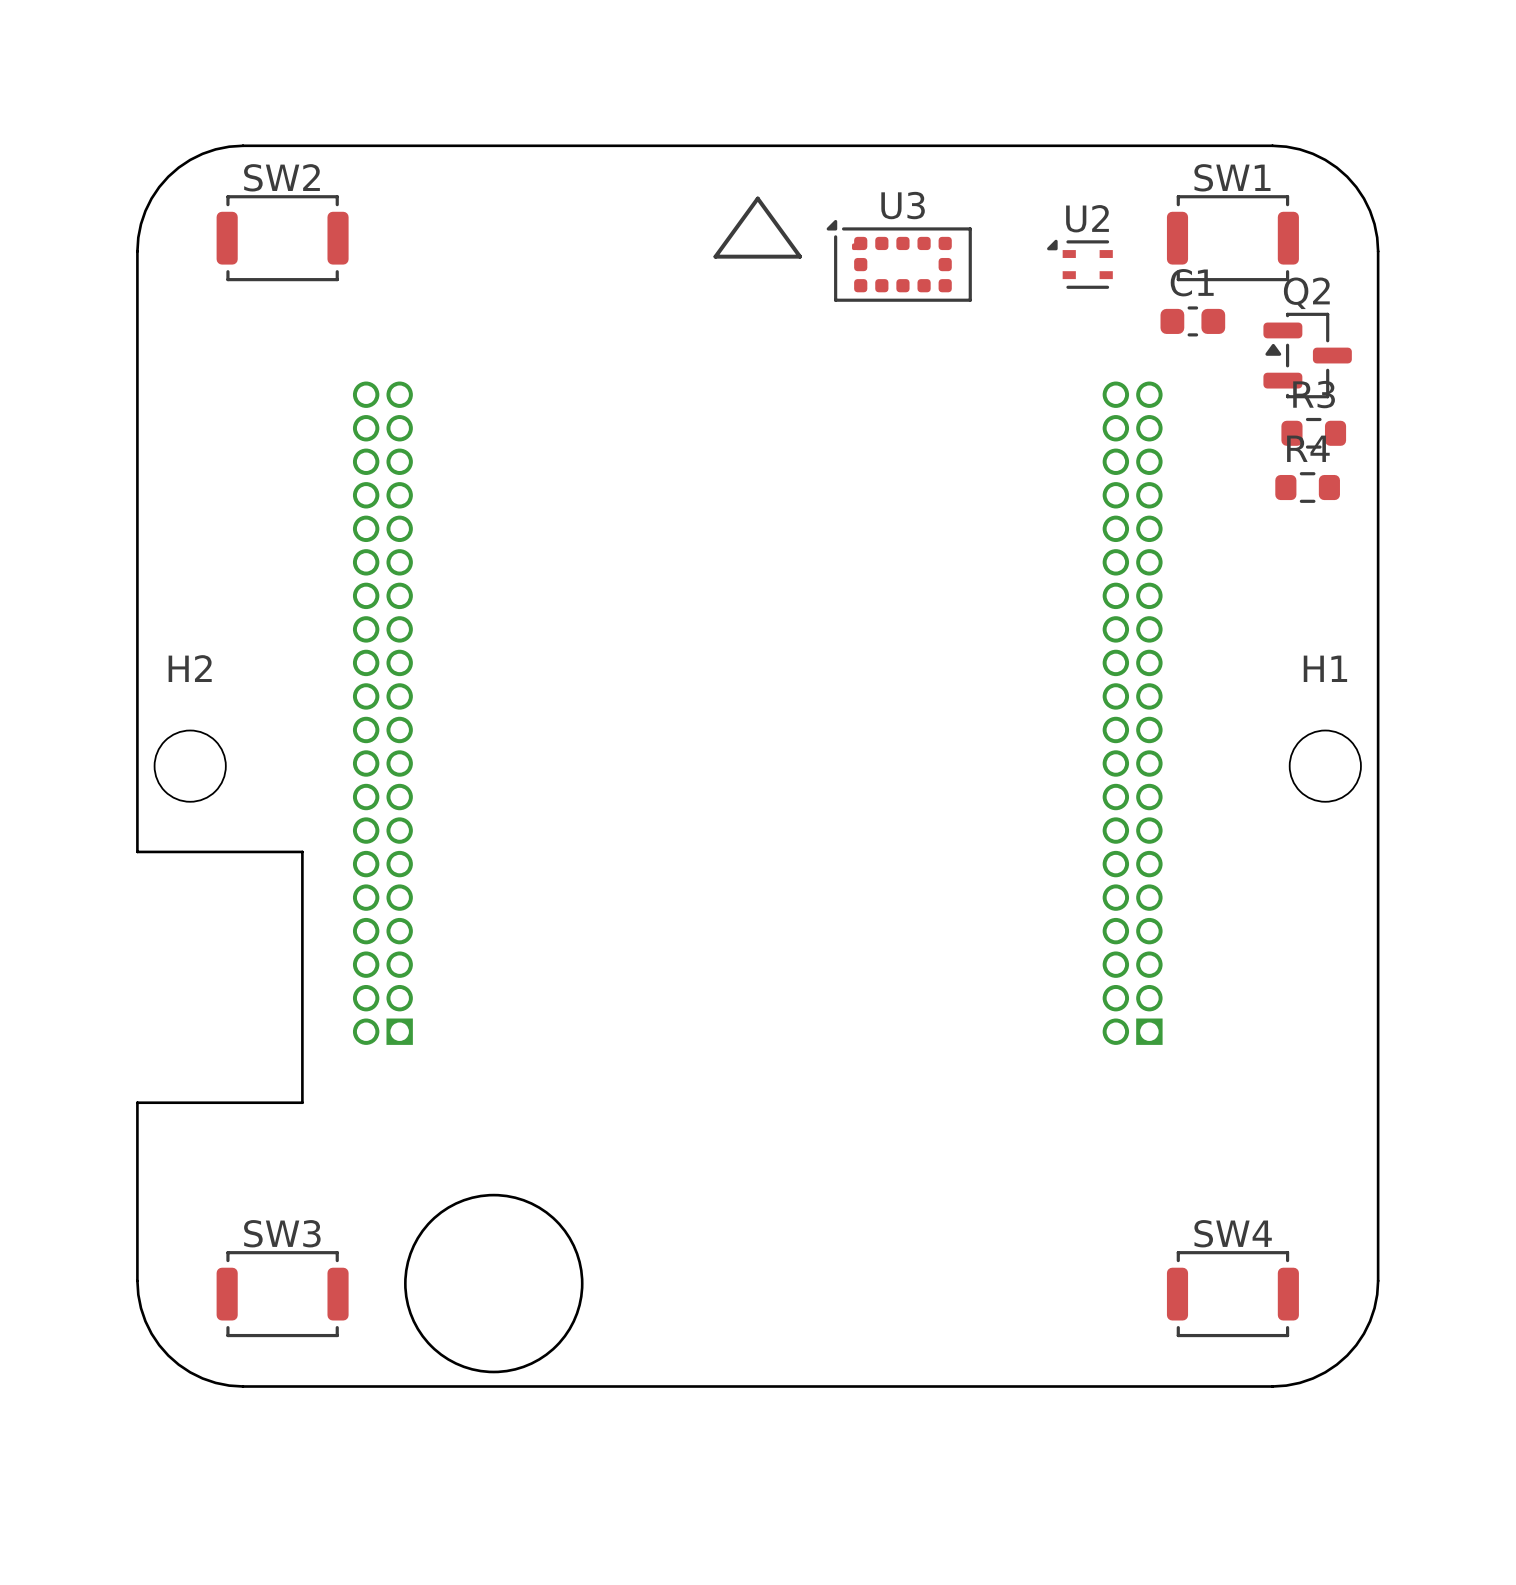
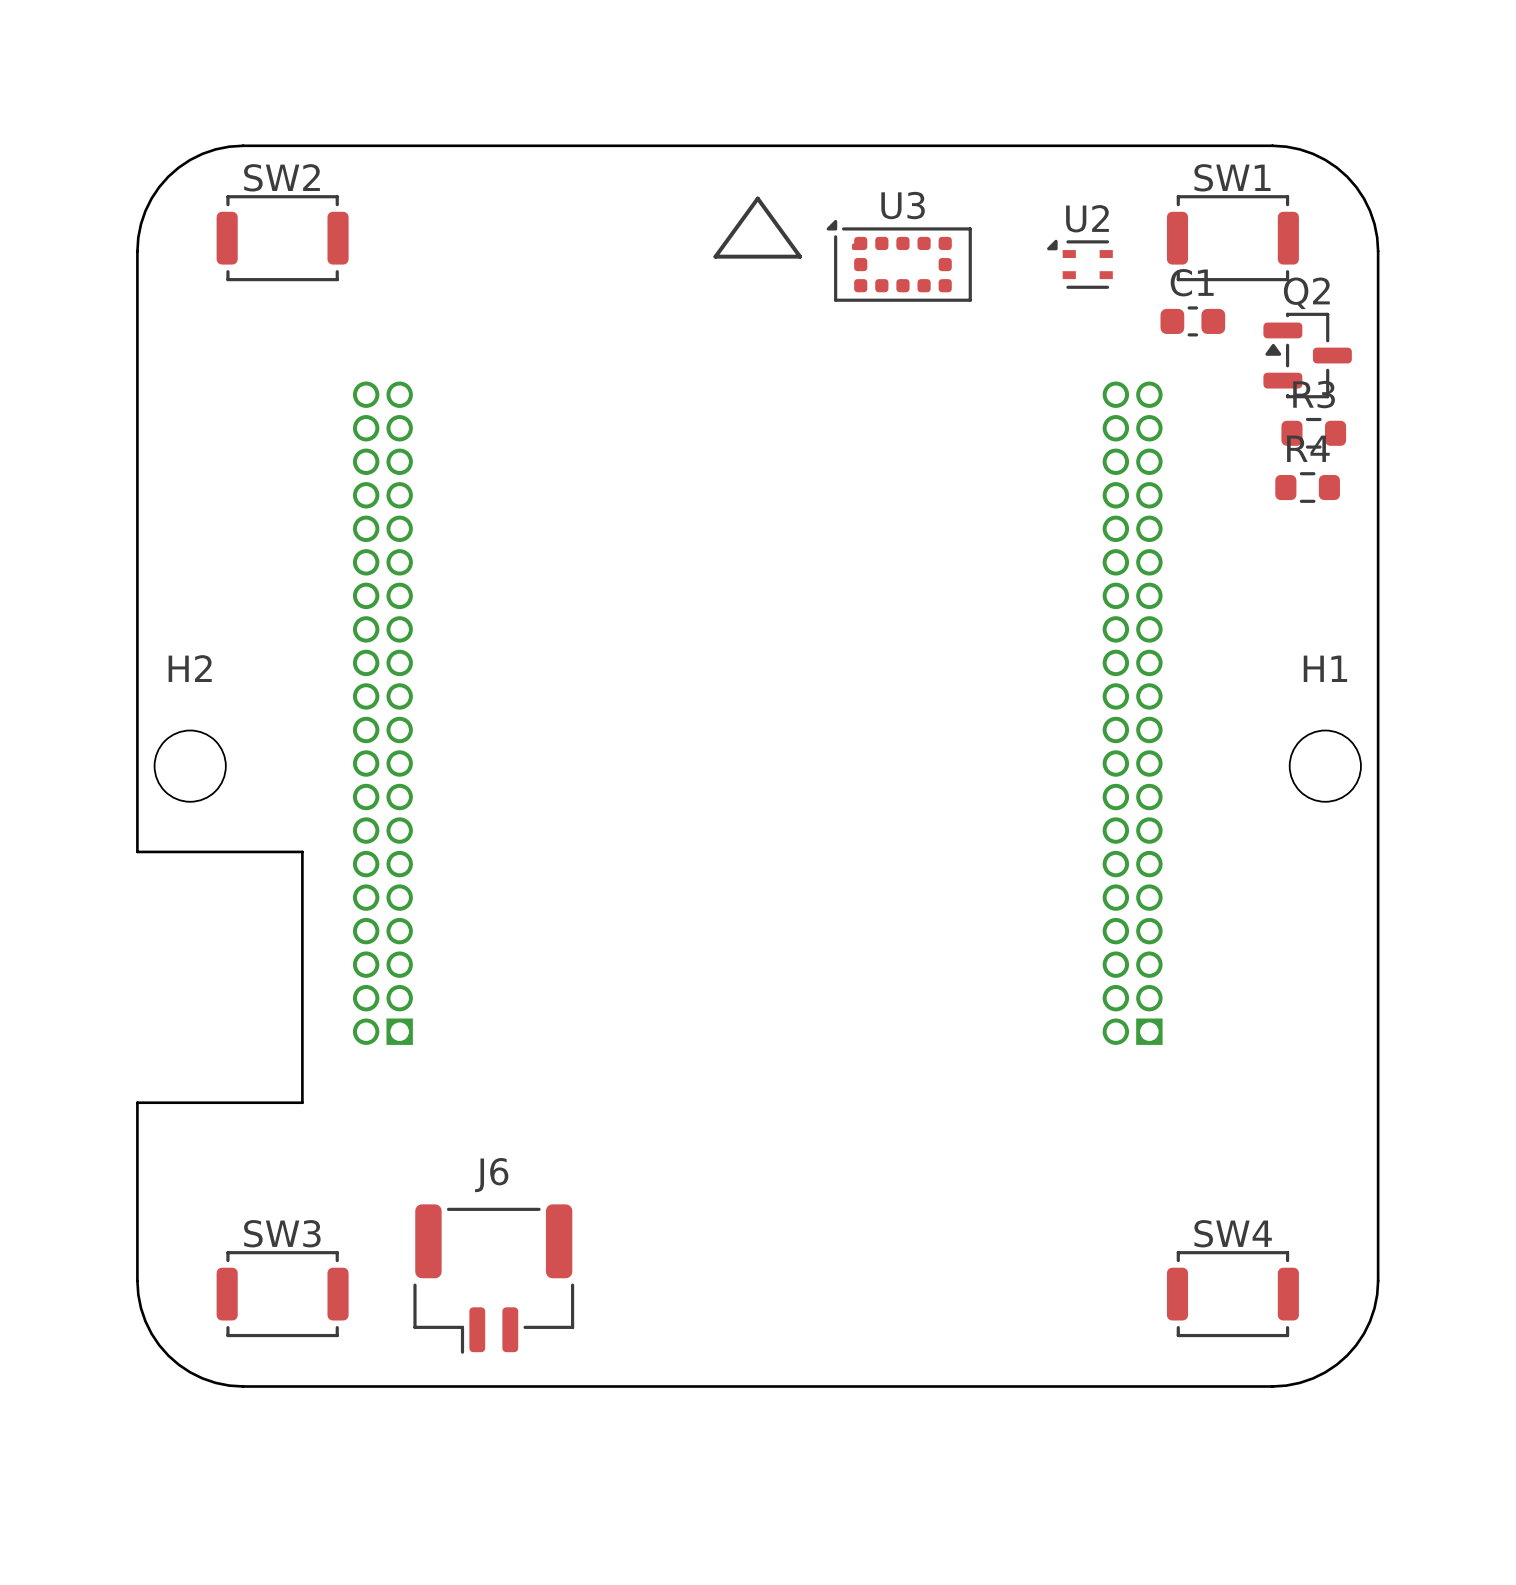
round board edge: [404, 1193, 584, 1374] -> none
J6: none -> (493, 1279)

